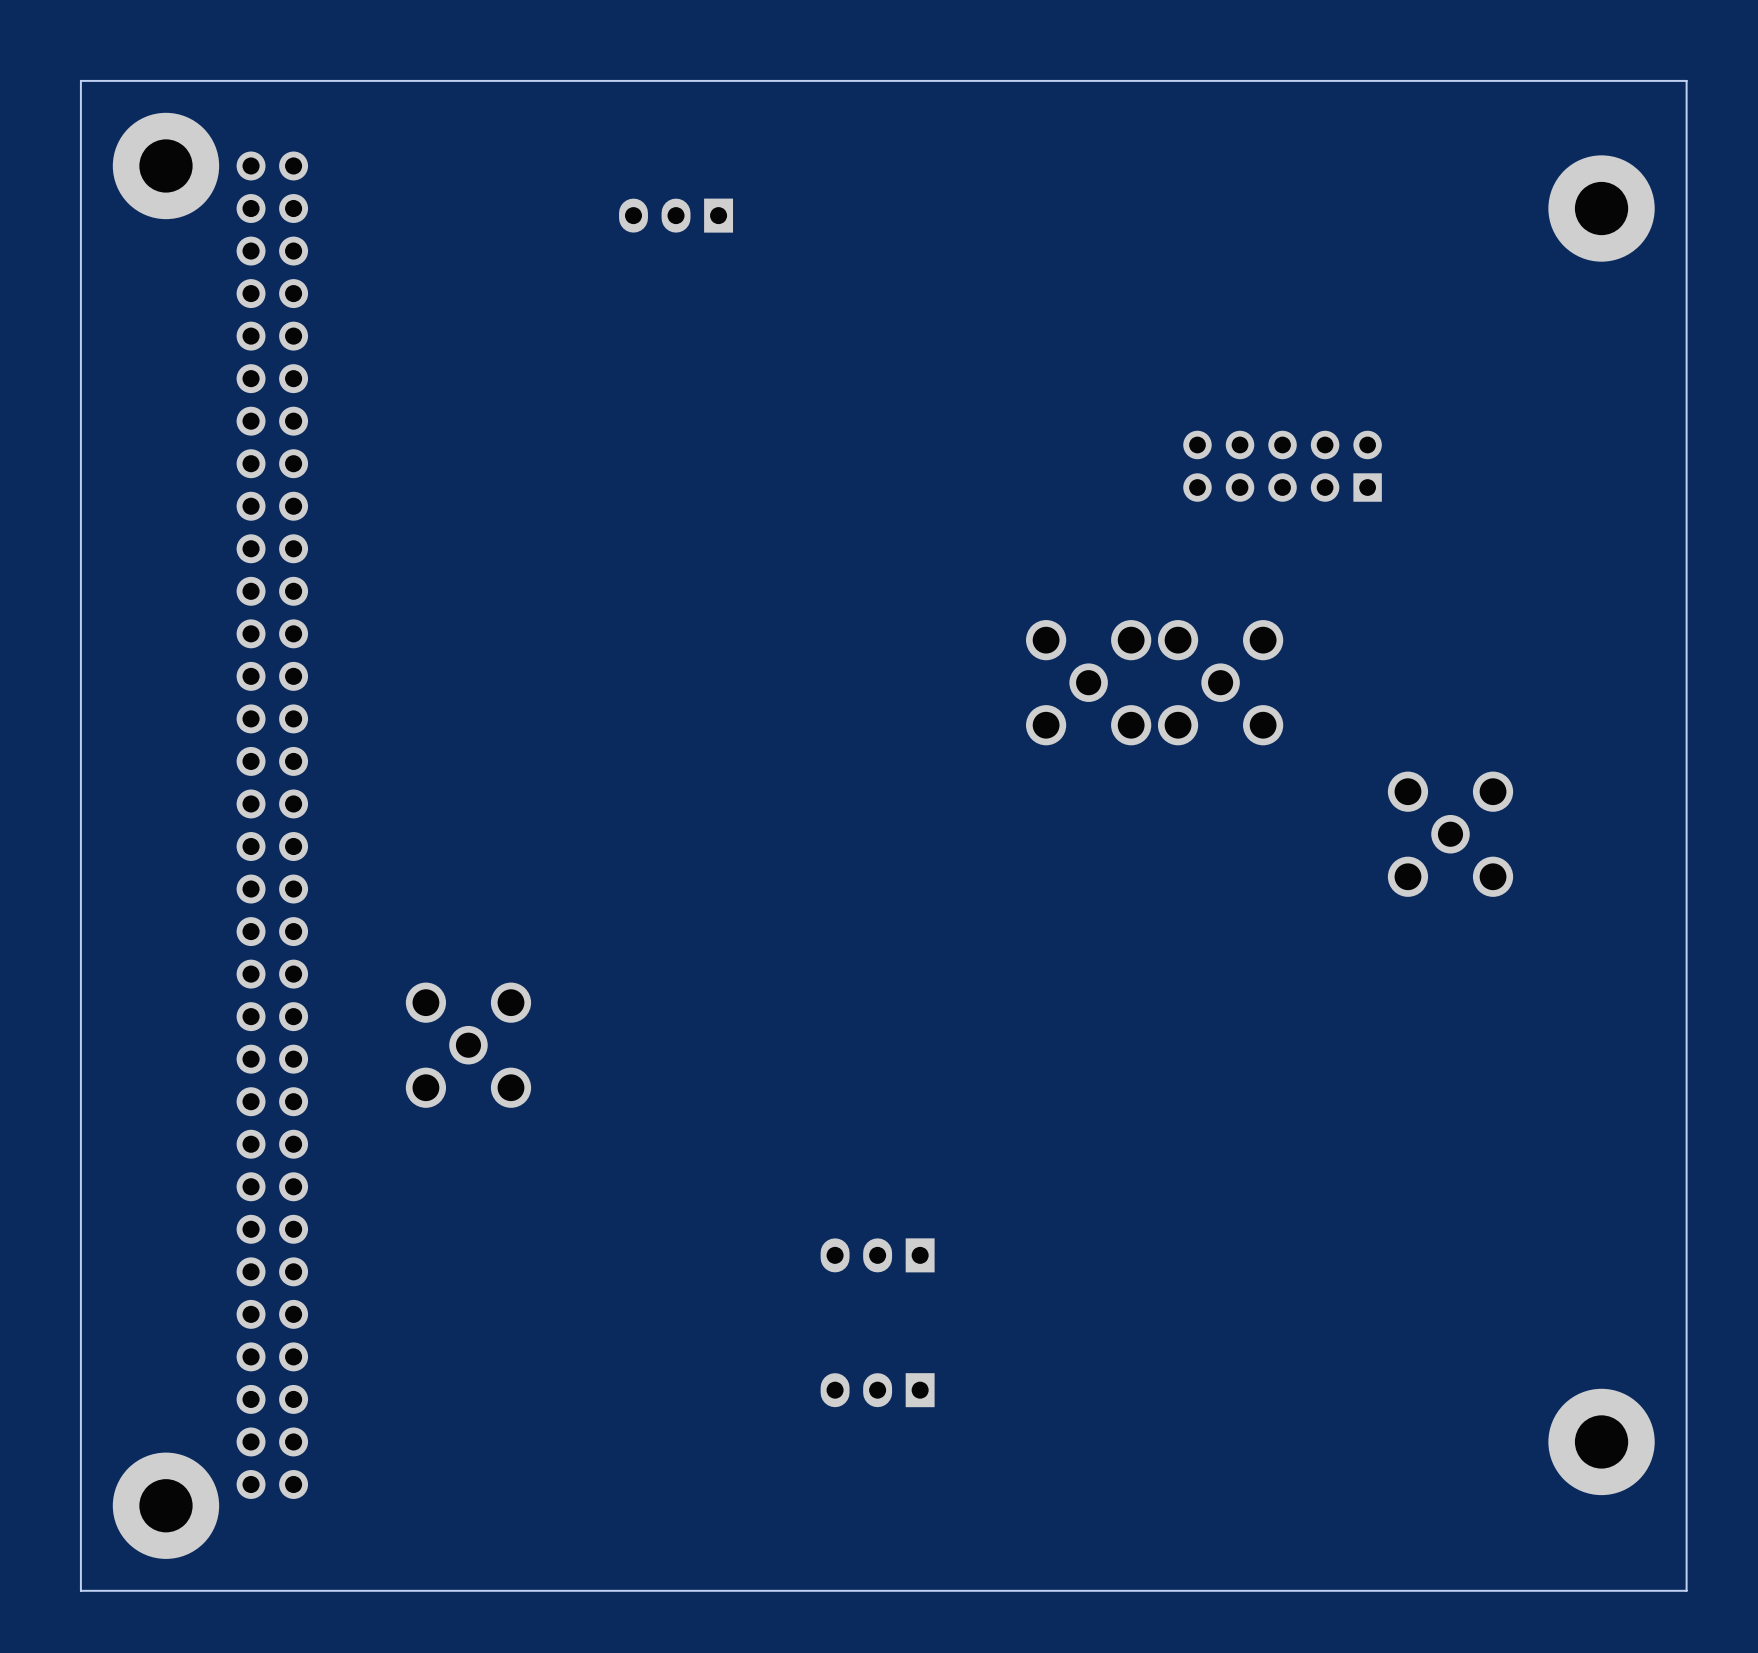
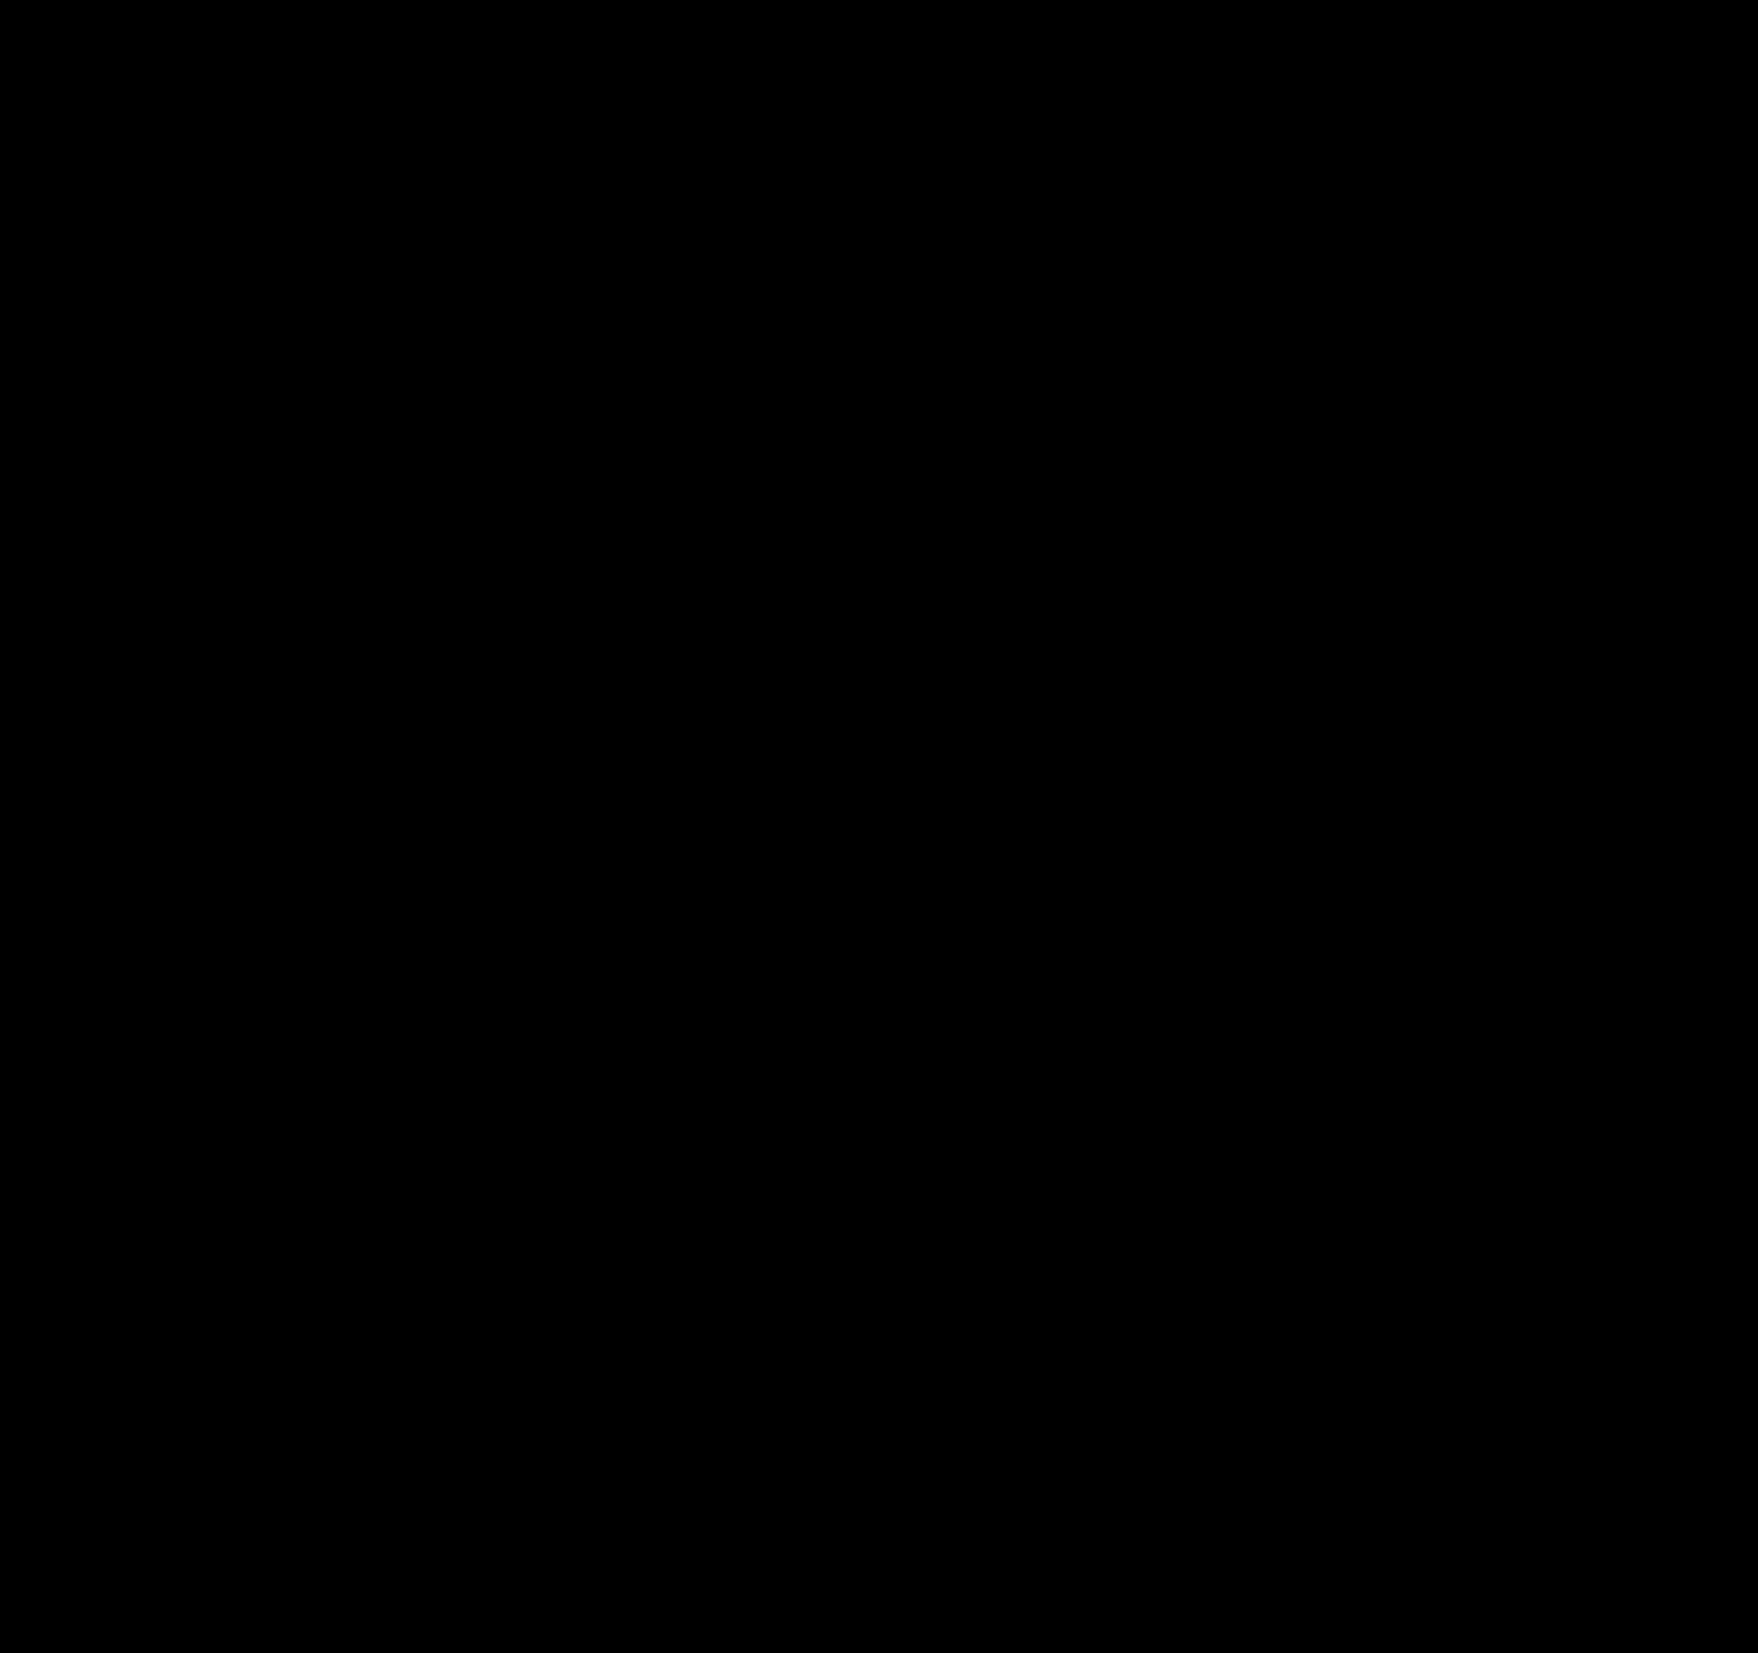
board edge: (1686, 80) (1686, 1590) (80, 1590) (80, 80) (1686, 80) -> none
part: (165, 165) -> none
part: (1601, 208) -> none
part: (676, 215) -> none
part: (1282, 466) -> none
part: (1088, 682) -> none
part: (1220, 682) -> none
part: (272, 825) -> none
part: (1450, 834) -> none
part: (468, 1045) -> none
part: (877, 1255) -> none
part: (877, 1390) -> none
part: (1601, 1441) -> none
part: (165, 1505) -> none

